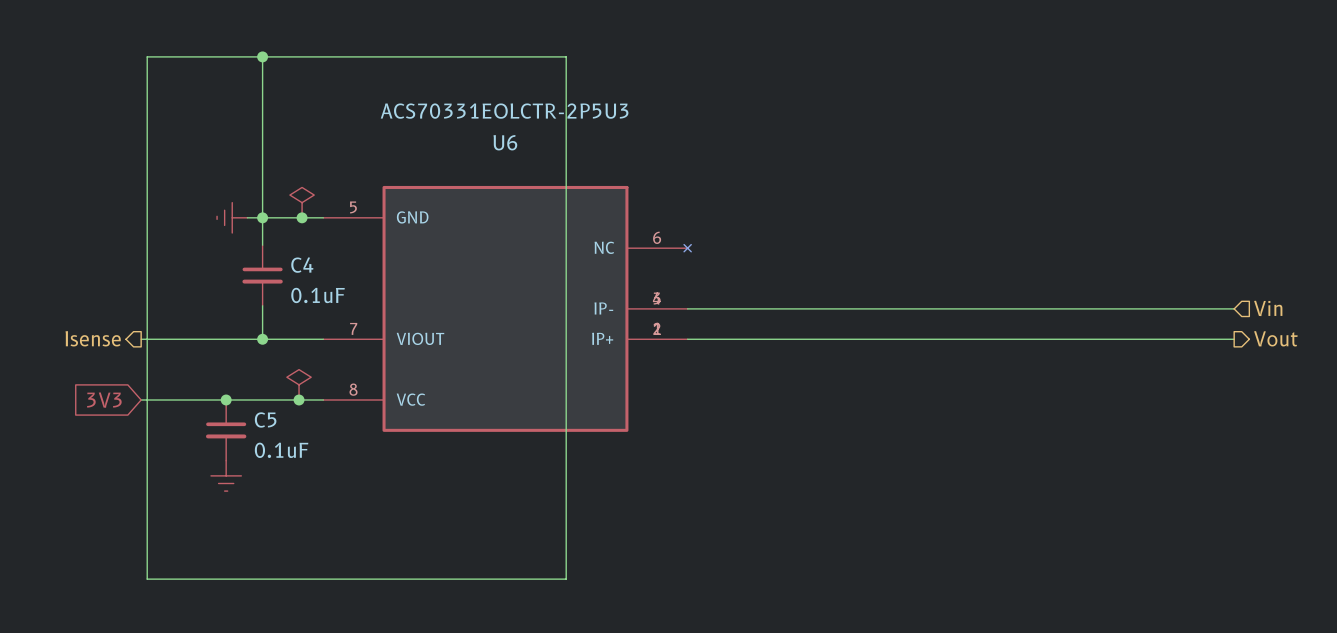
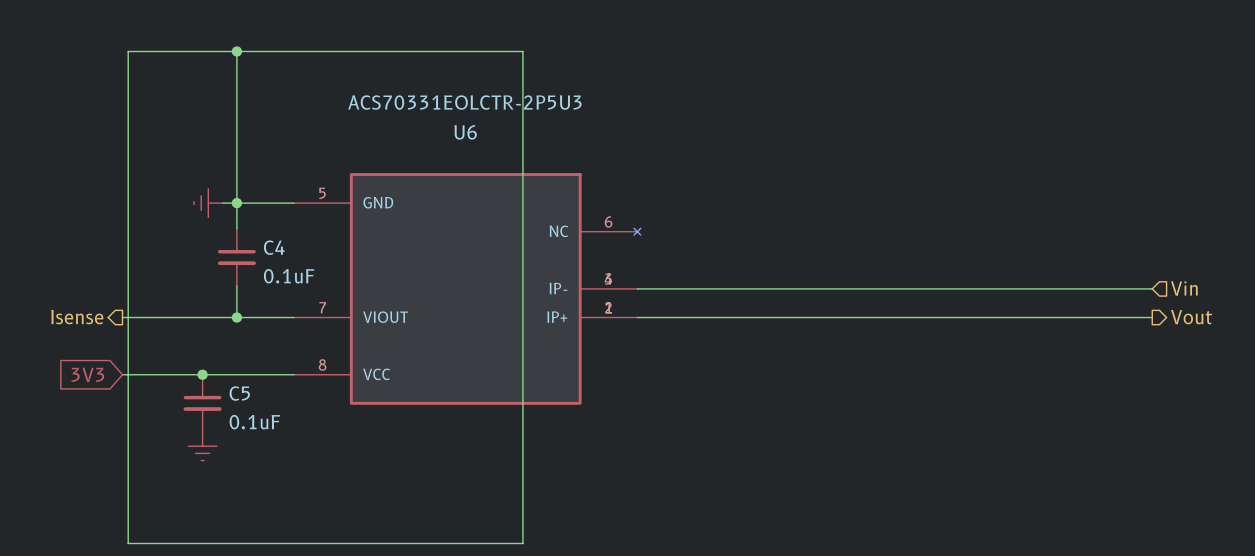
power symbol: (302, 202) -> none
junction: (302, 217) -> none
power symbol: (299, 384) -> none
junction: (299, 399) -> none

